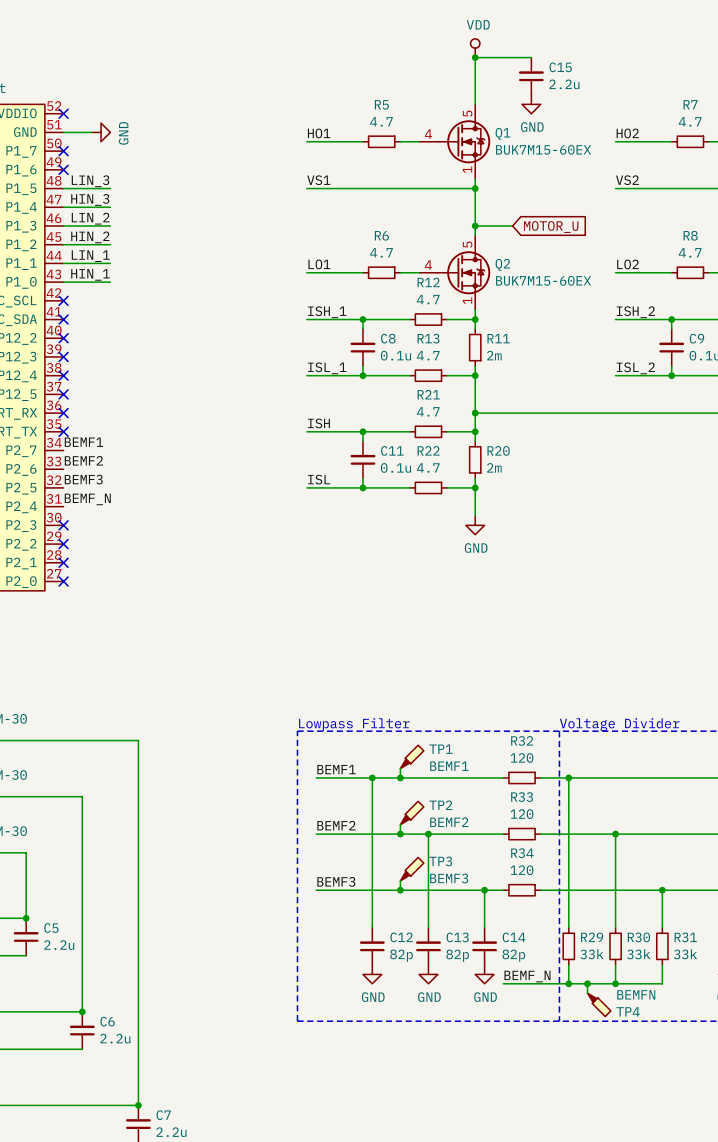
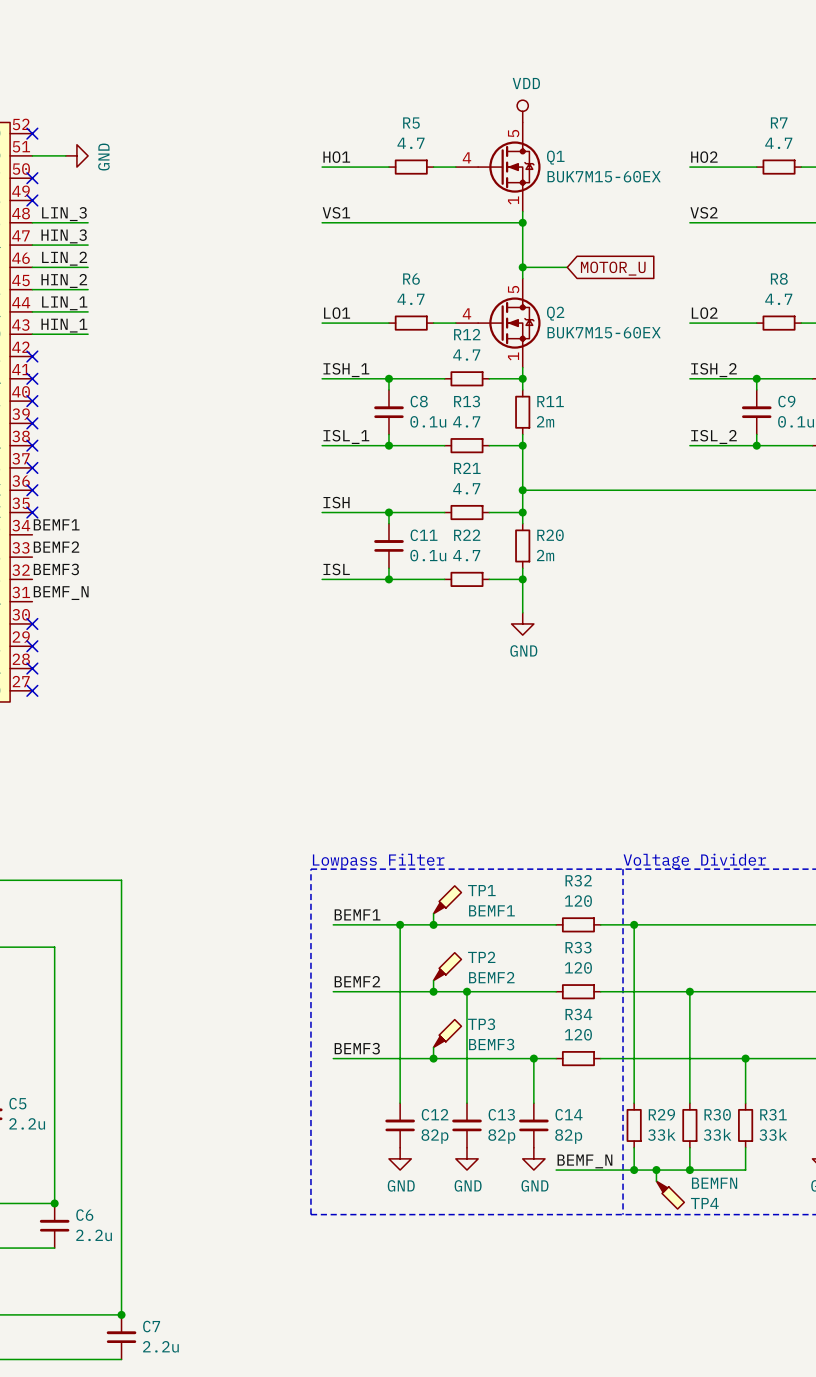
power symbol position: VDD (475, 48) -> VDD (522, 111)
junction: (475, 57) -> none
wire: (531, 57) (475, 57) (475, 104) -> none
C15: 2.2u (531, 76) -> none
power symbol: GND (531, 104) -> none

